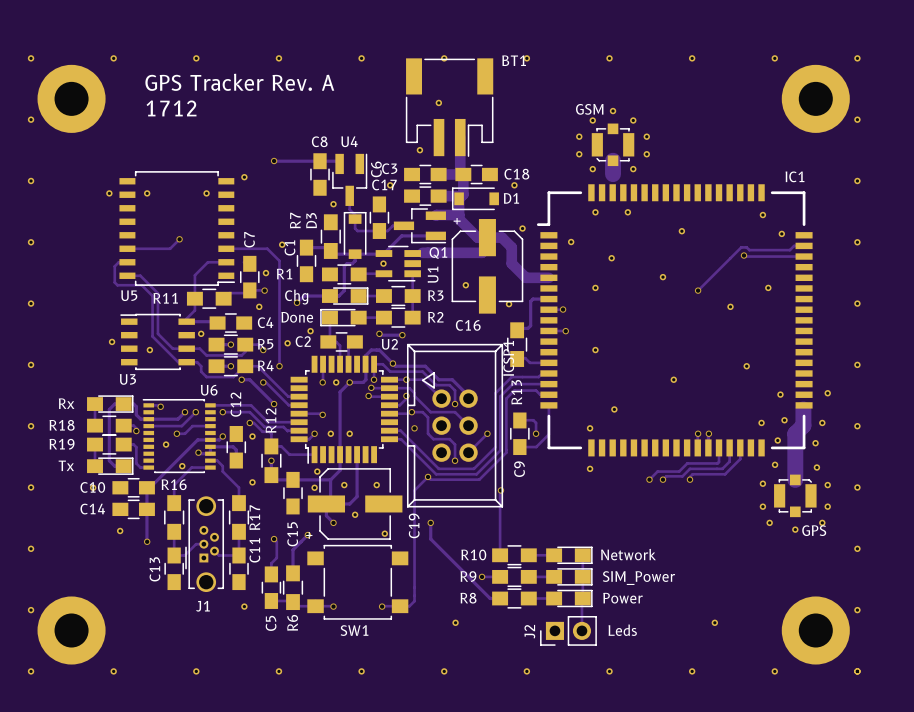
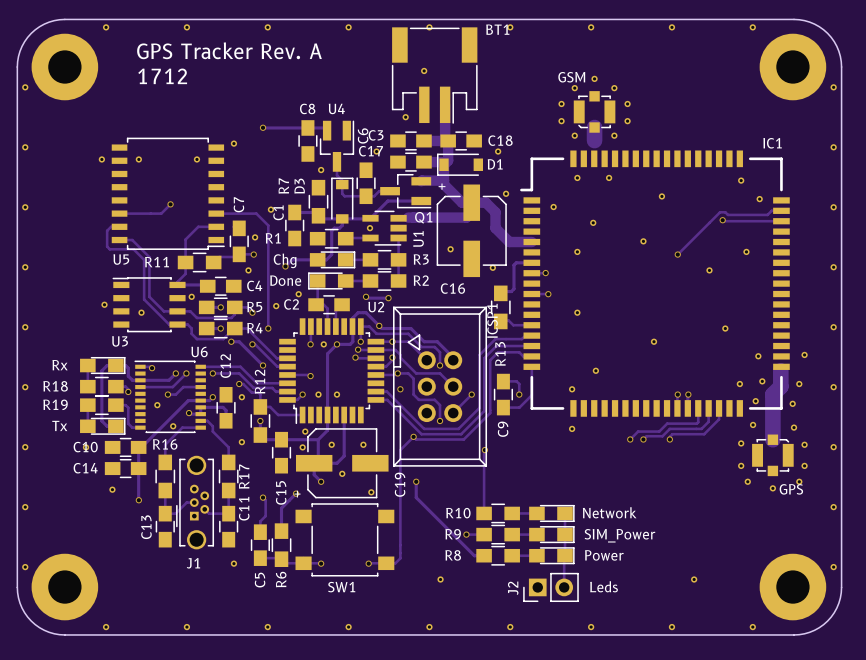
board edge: none -> (64, 19) (794, 19) (809, 22) (823, 29) (836, 46) (841, 67) (841, 587) (838, 603) (831, 617) (814, 630) (794, 634) (64, 634) (49, 632) (35, 624) (22, 608) (17, 587) (17, 67) (22, 46) (31, 33) (44, 24) (64, 19)
part: (31, 58) -> none
part: (857, 58) -> none
part: (31, 671) -> none
part: (857, 671) -> none

